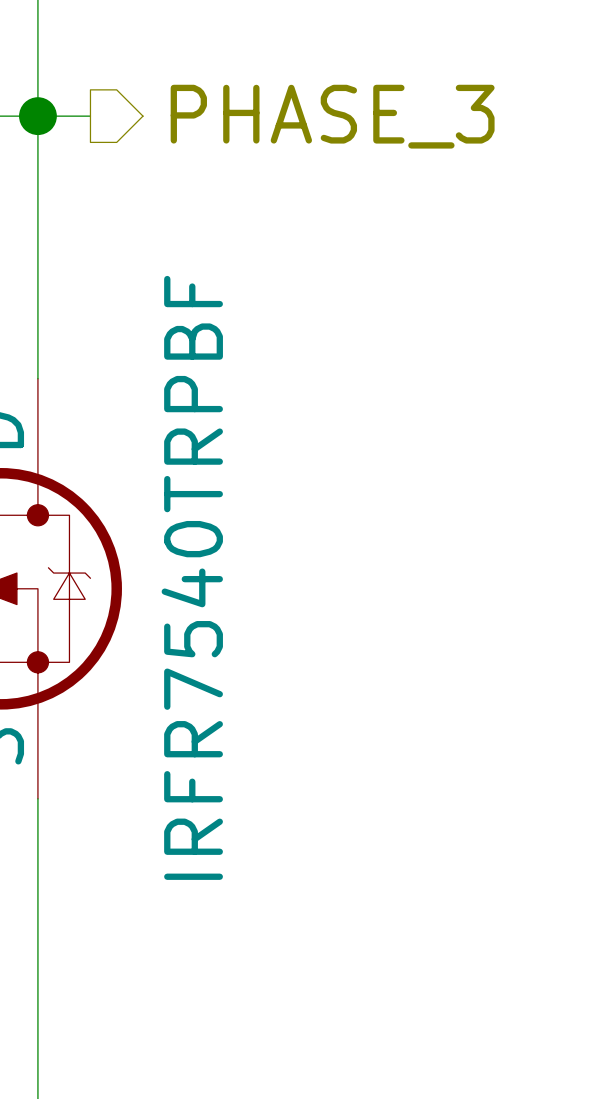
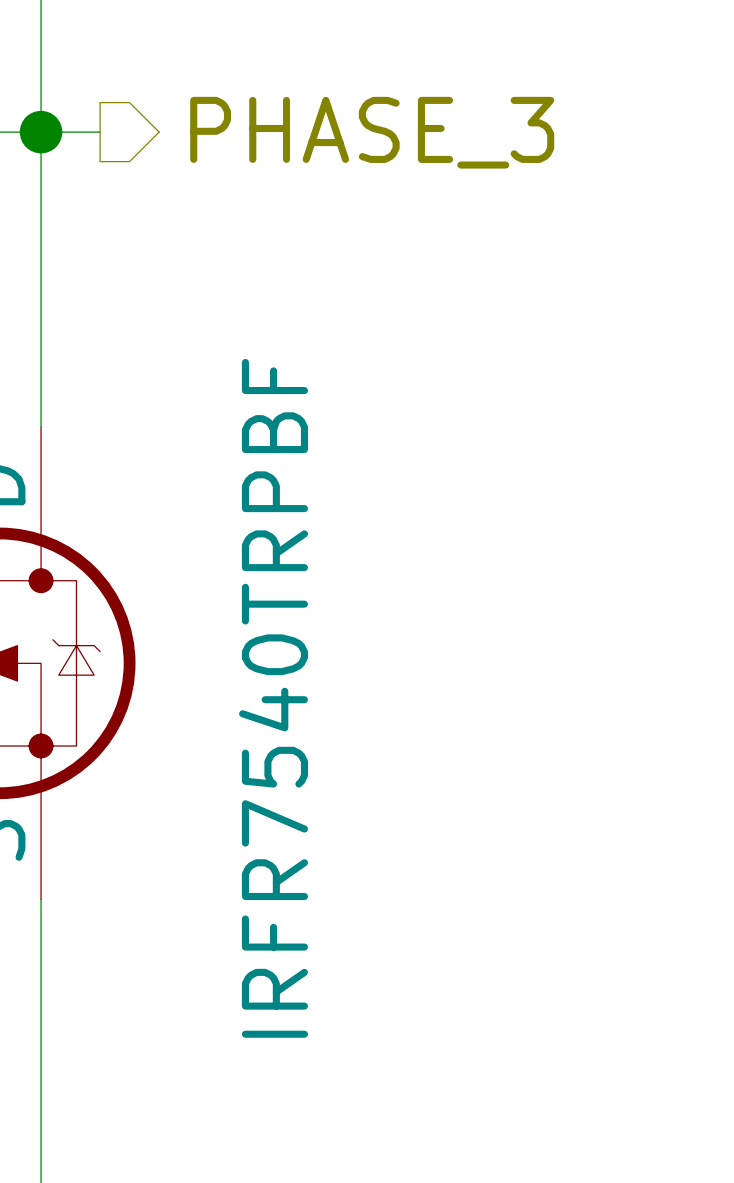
part value position: IRFR7540TRPBF (192, 577) -> IRFR7540TRPBF (273, 698)

